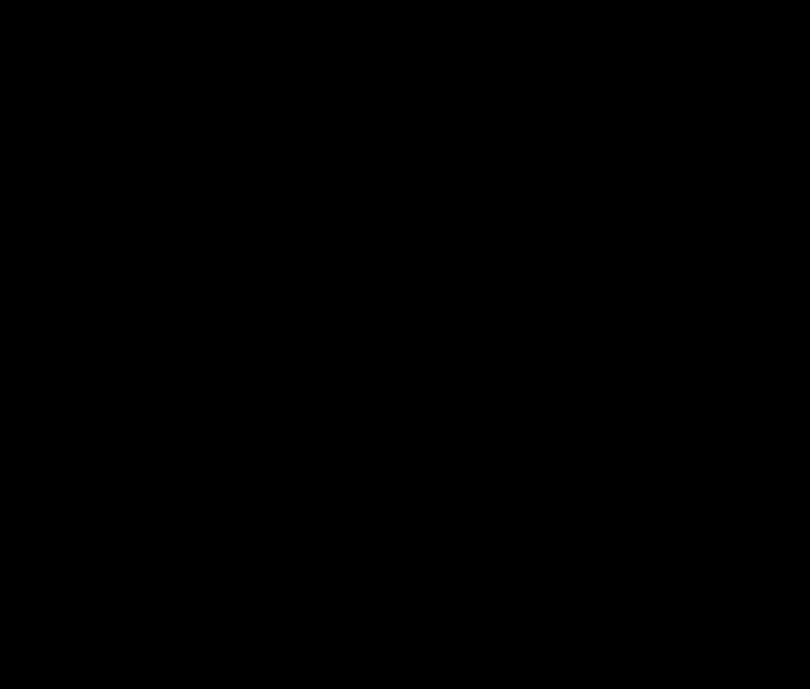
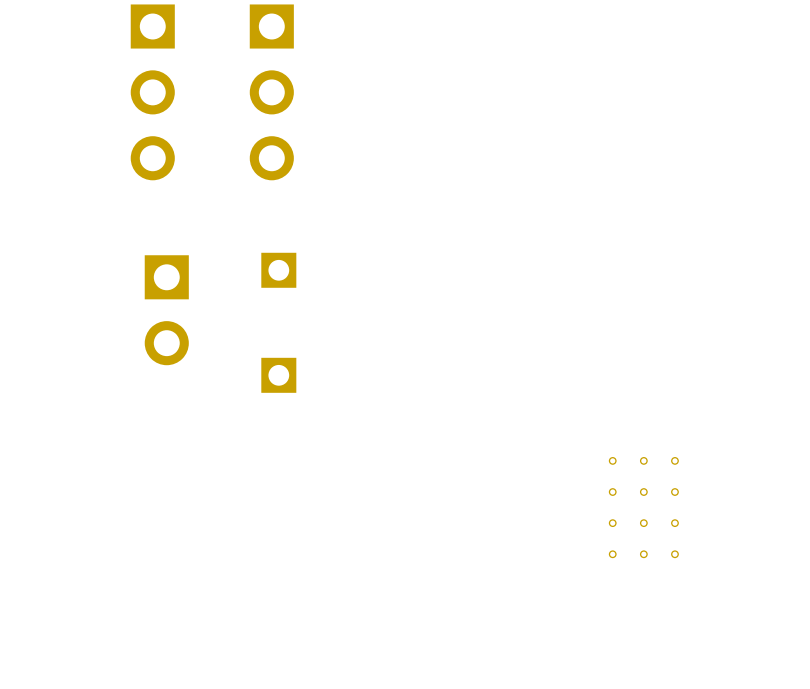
part: none -> (152, 92)
part: none -> (271, 92)
part: none -> (278, 270)
part: none -> (166, 310)
part: none -> (278, 375)
part: none -> (643, 507)

